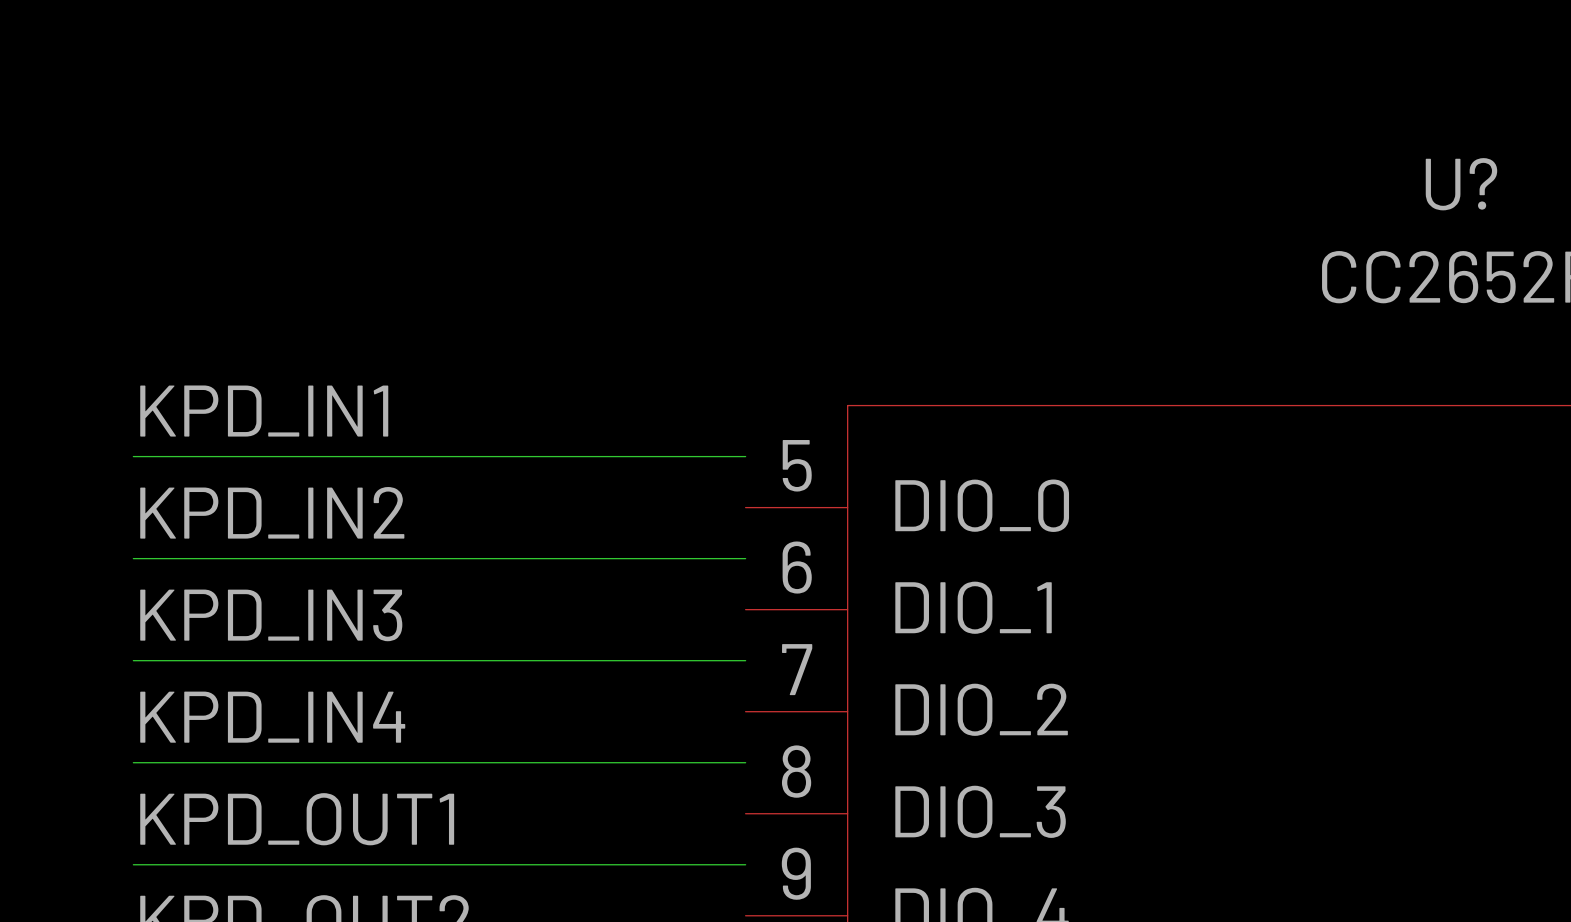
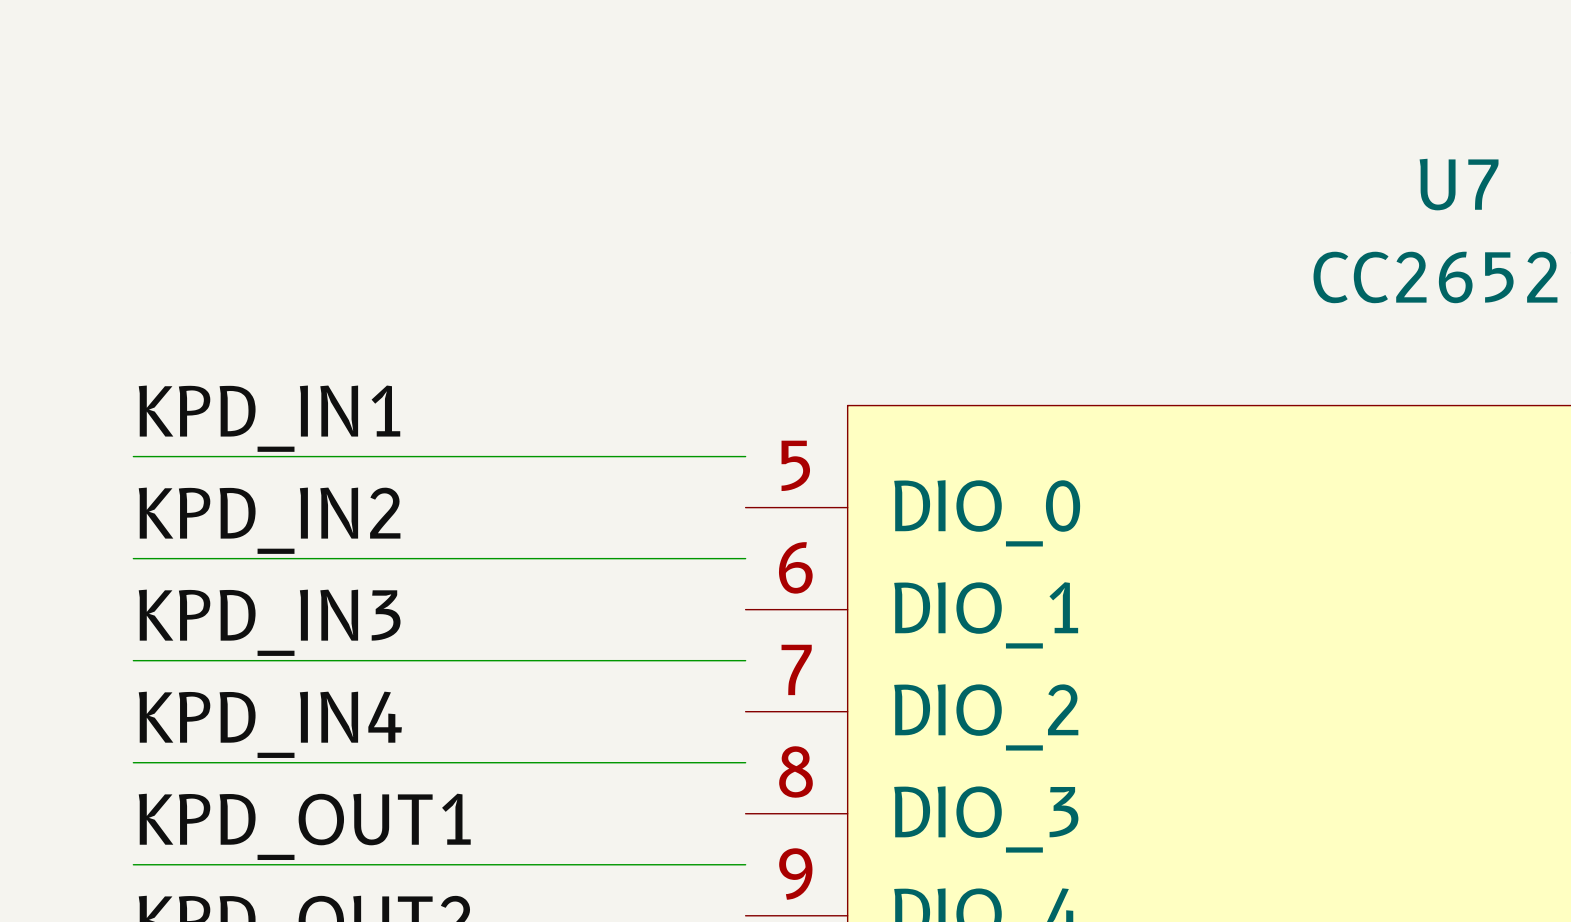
U? name: U? (1461, 184) -> U7 (1459, 184)

